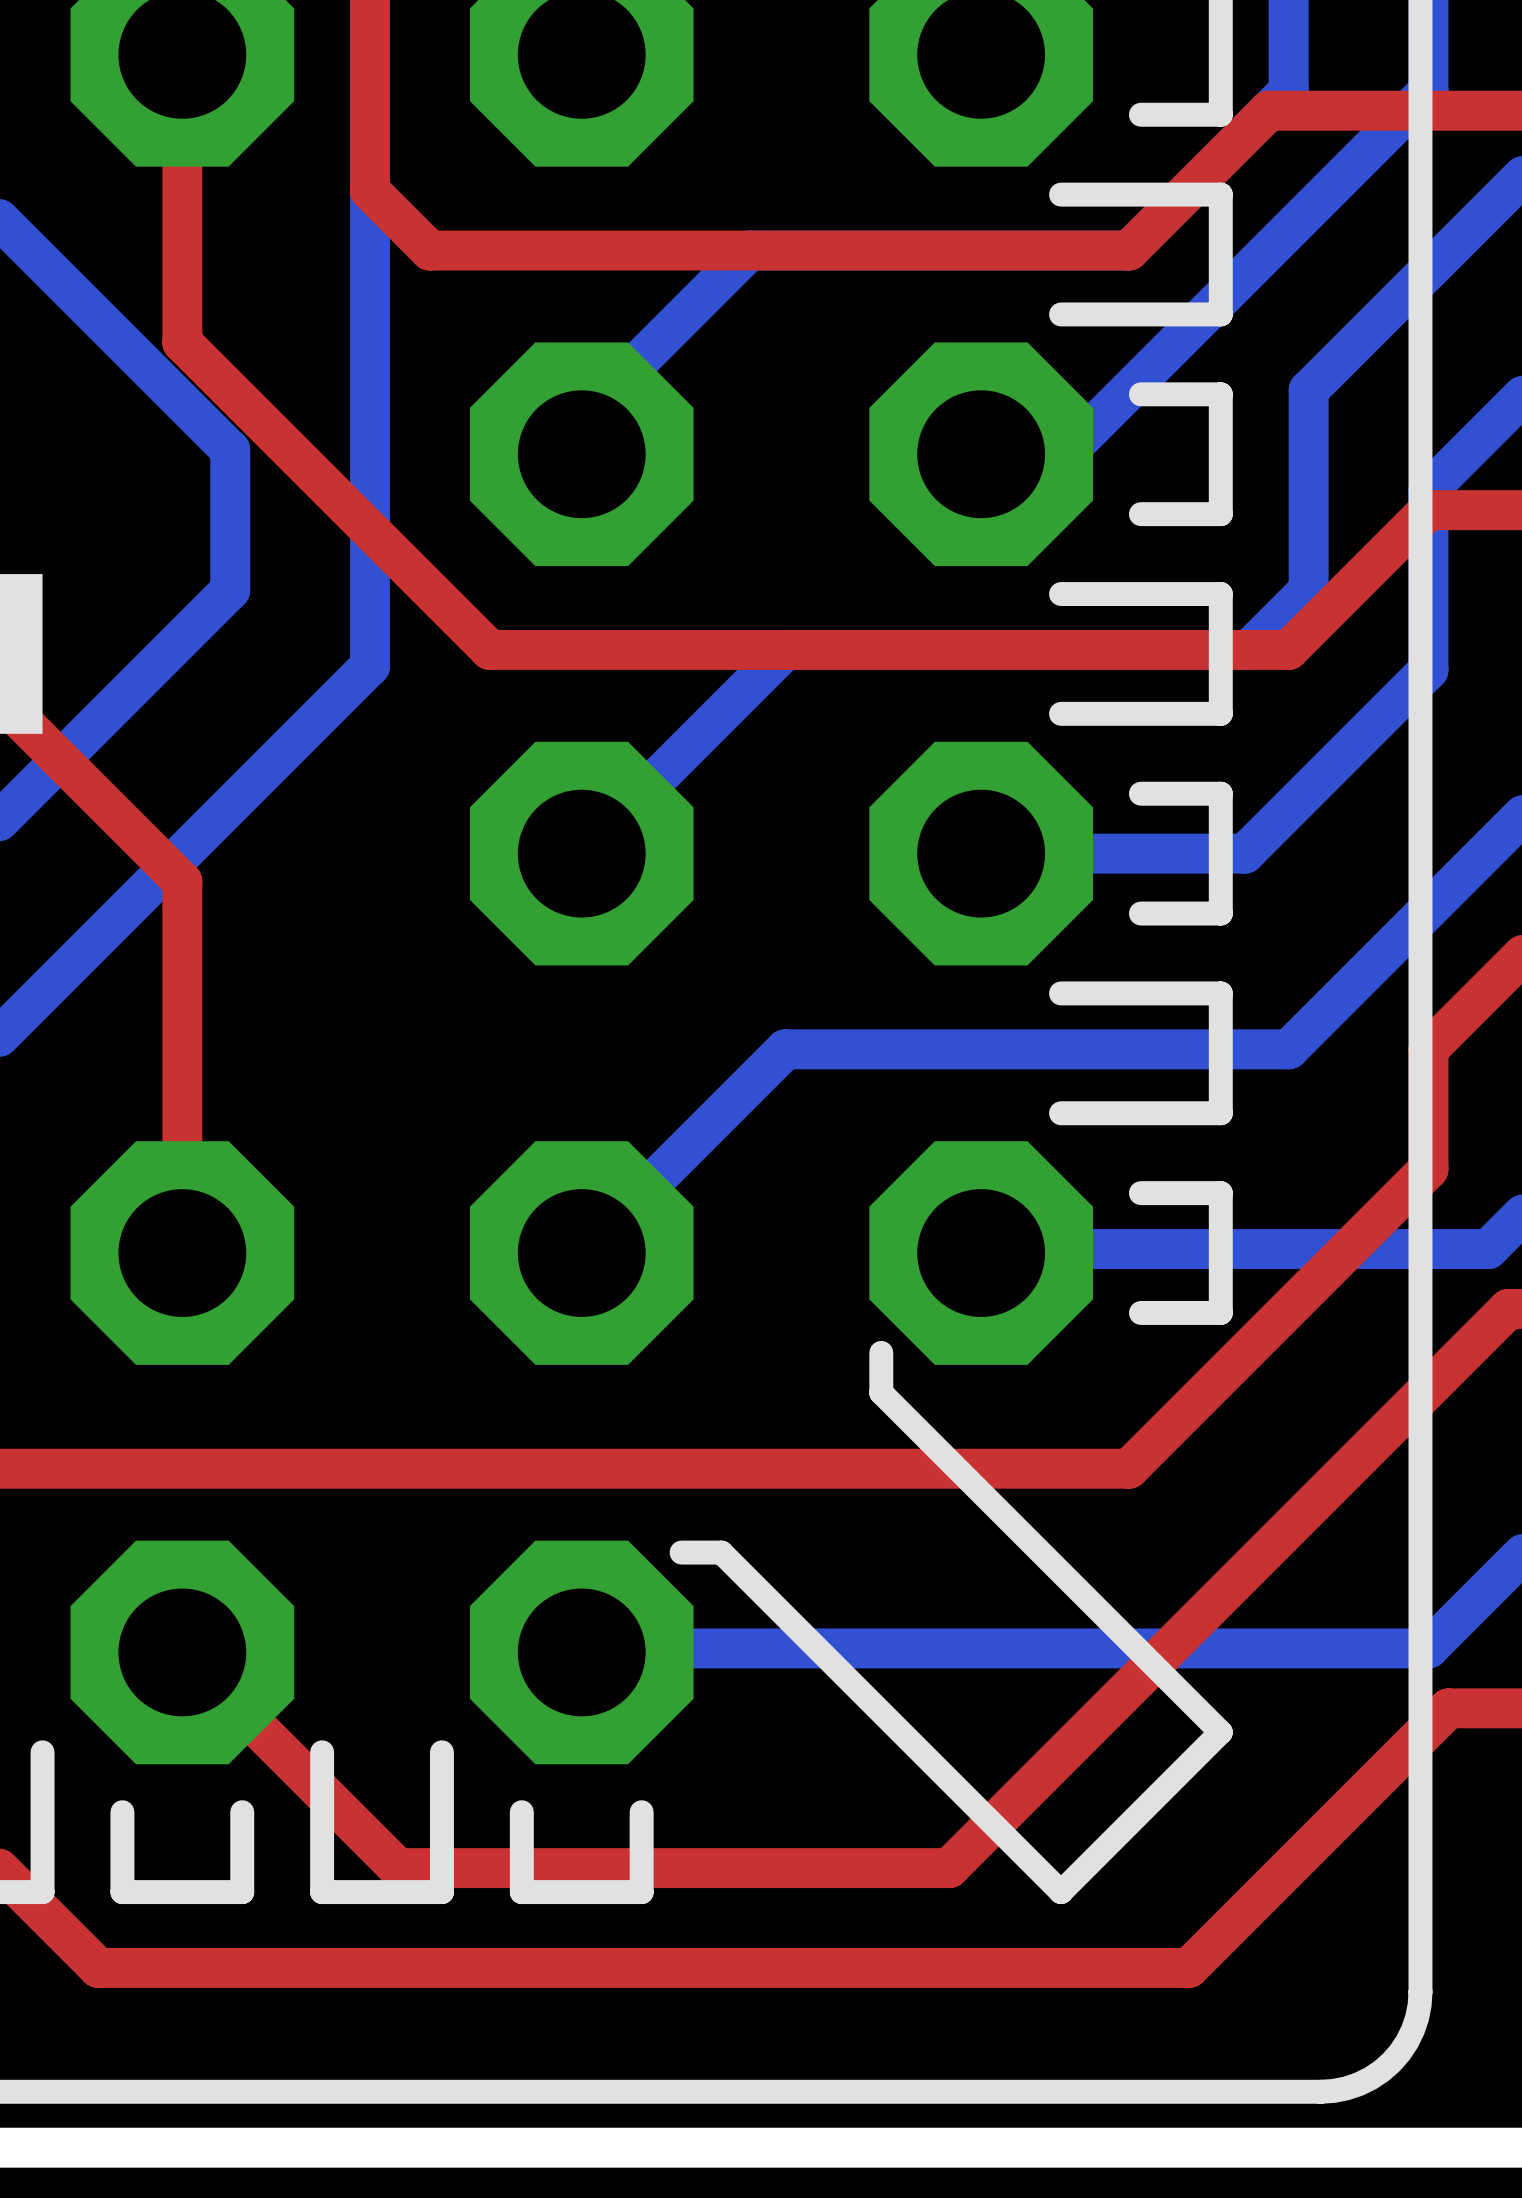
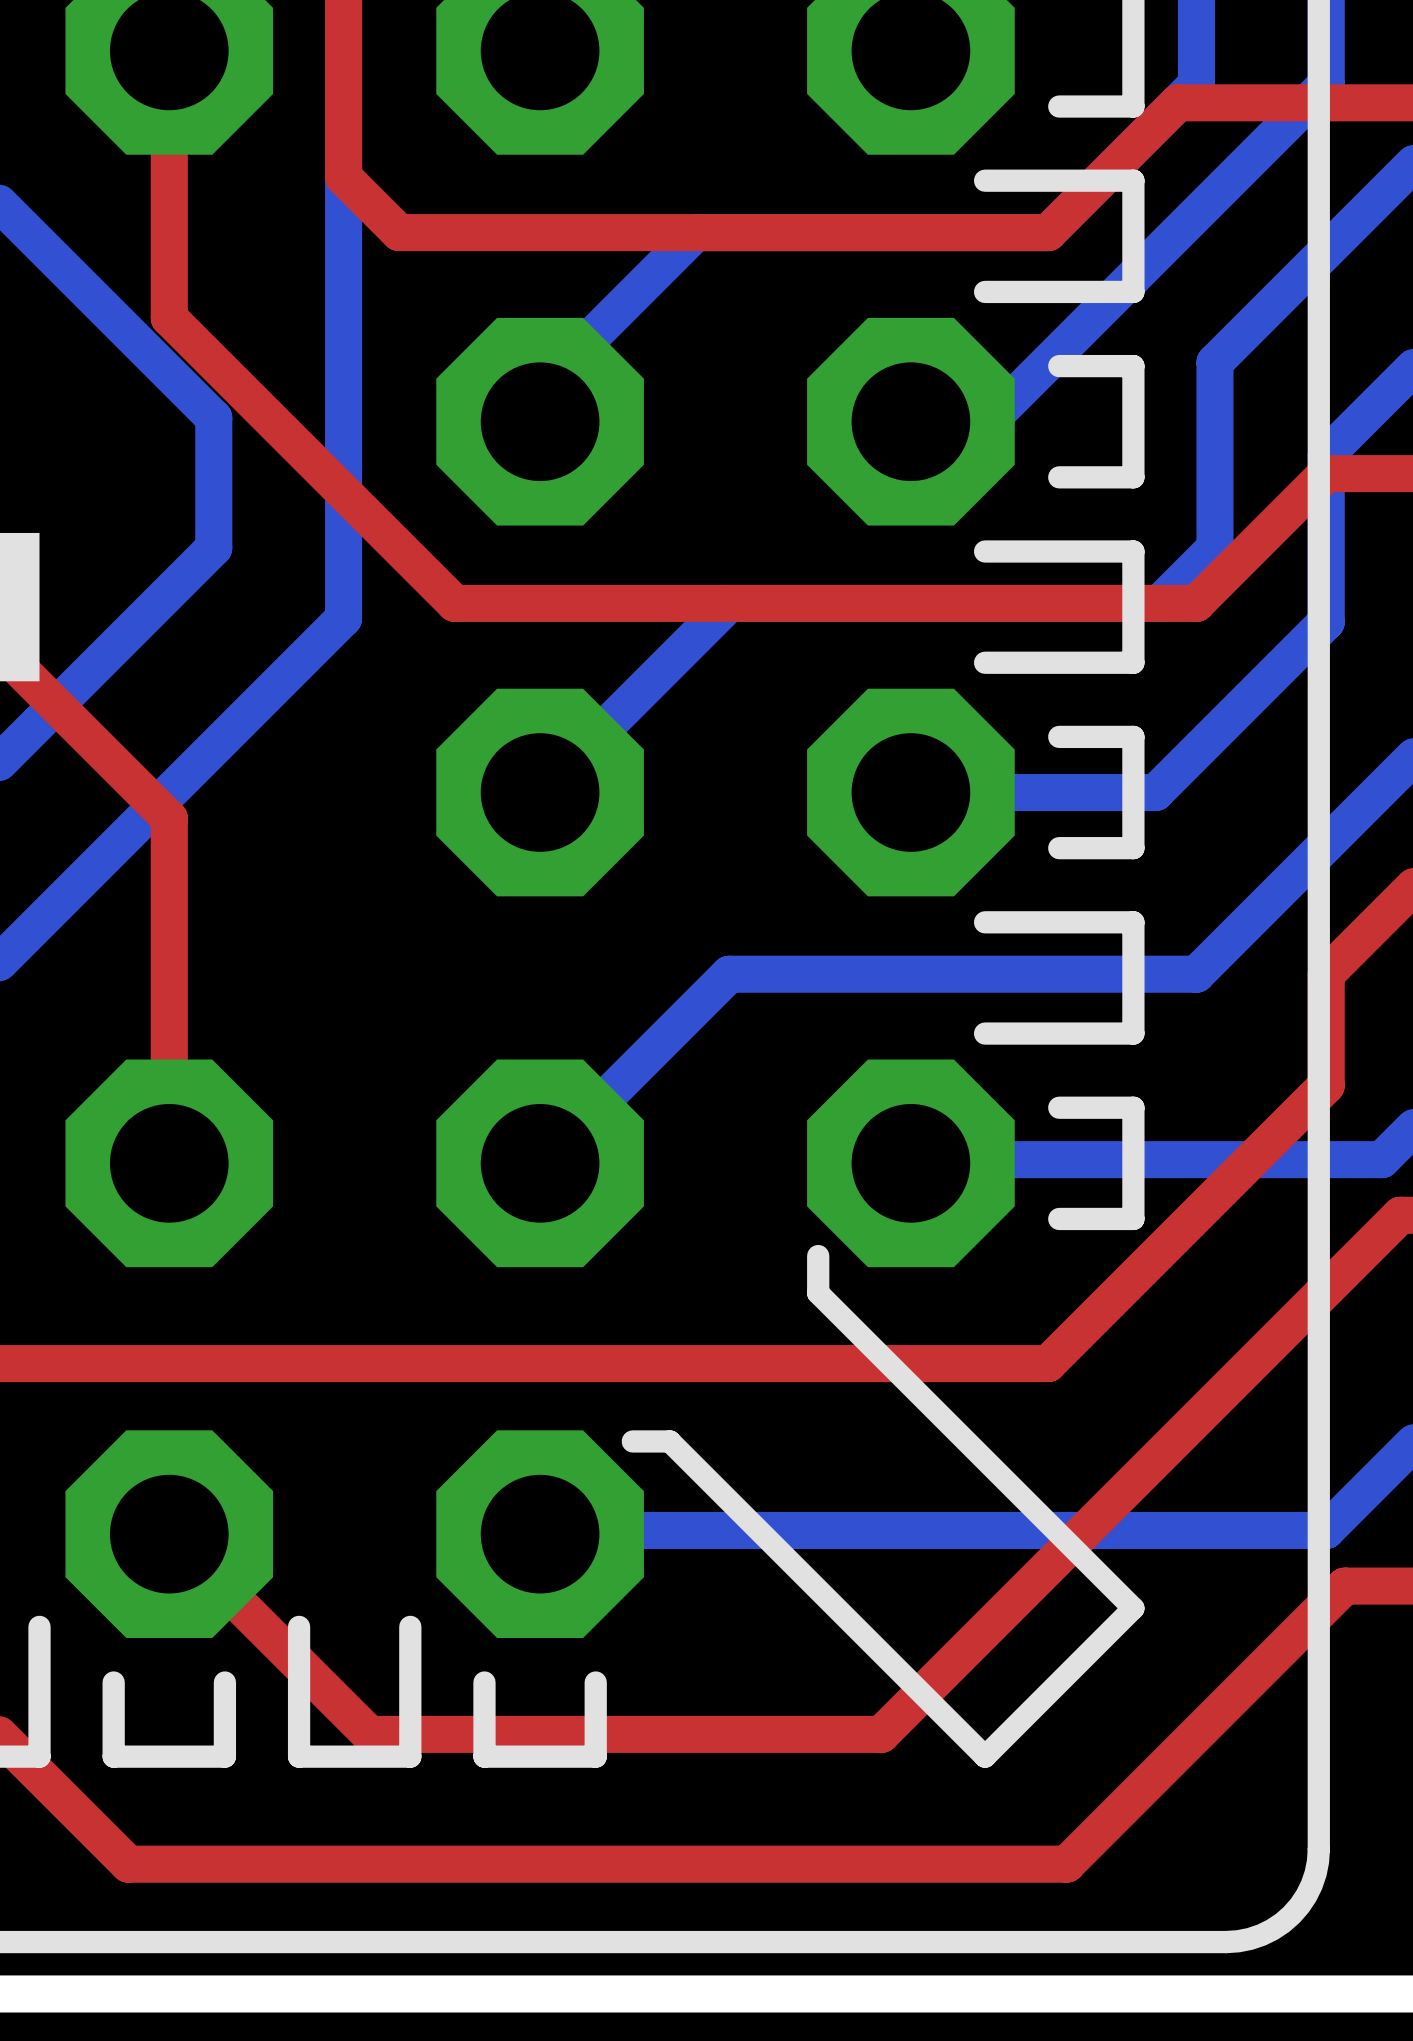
top track: (98, 1967) (1188, 1967) -> (91, 1827) (128, 1864) (1066, 1864) (1103, 1827)

